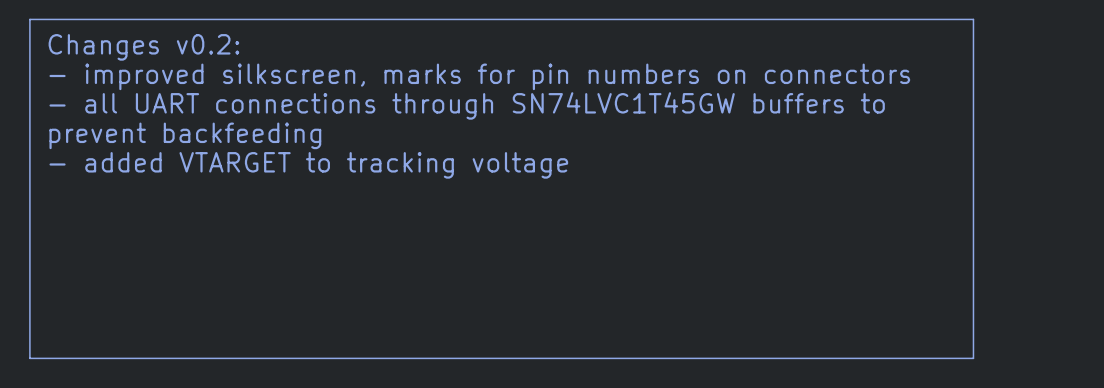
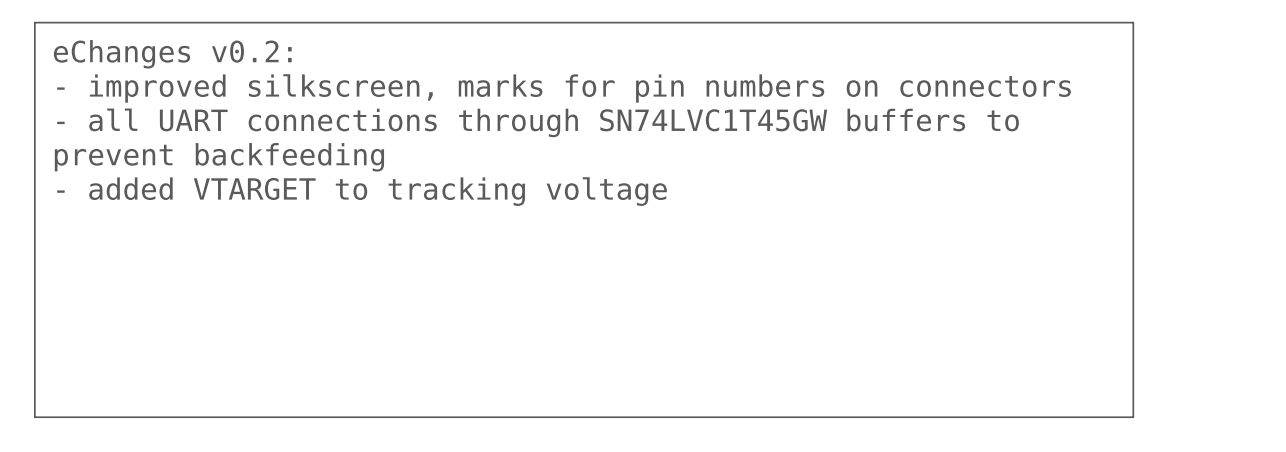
text: Changes v0.2: (143, 47) -> eChanges v0.2: (172, 54)

